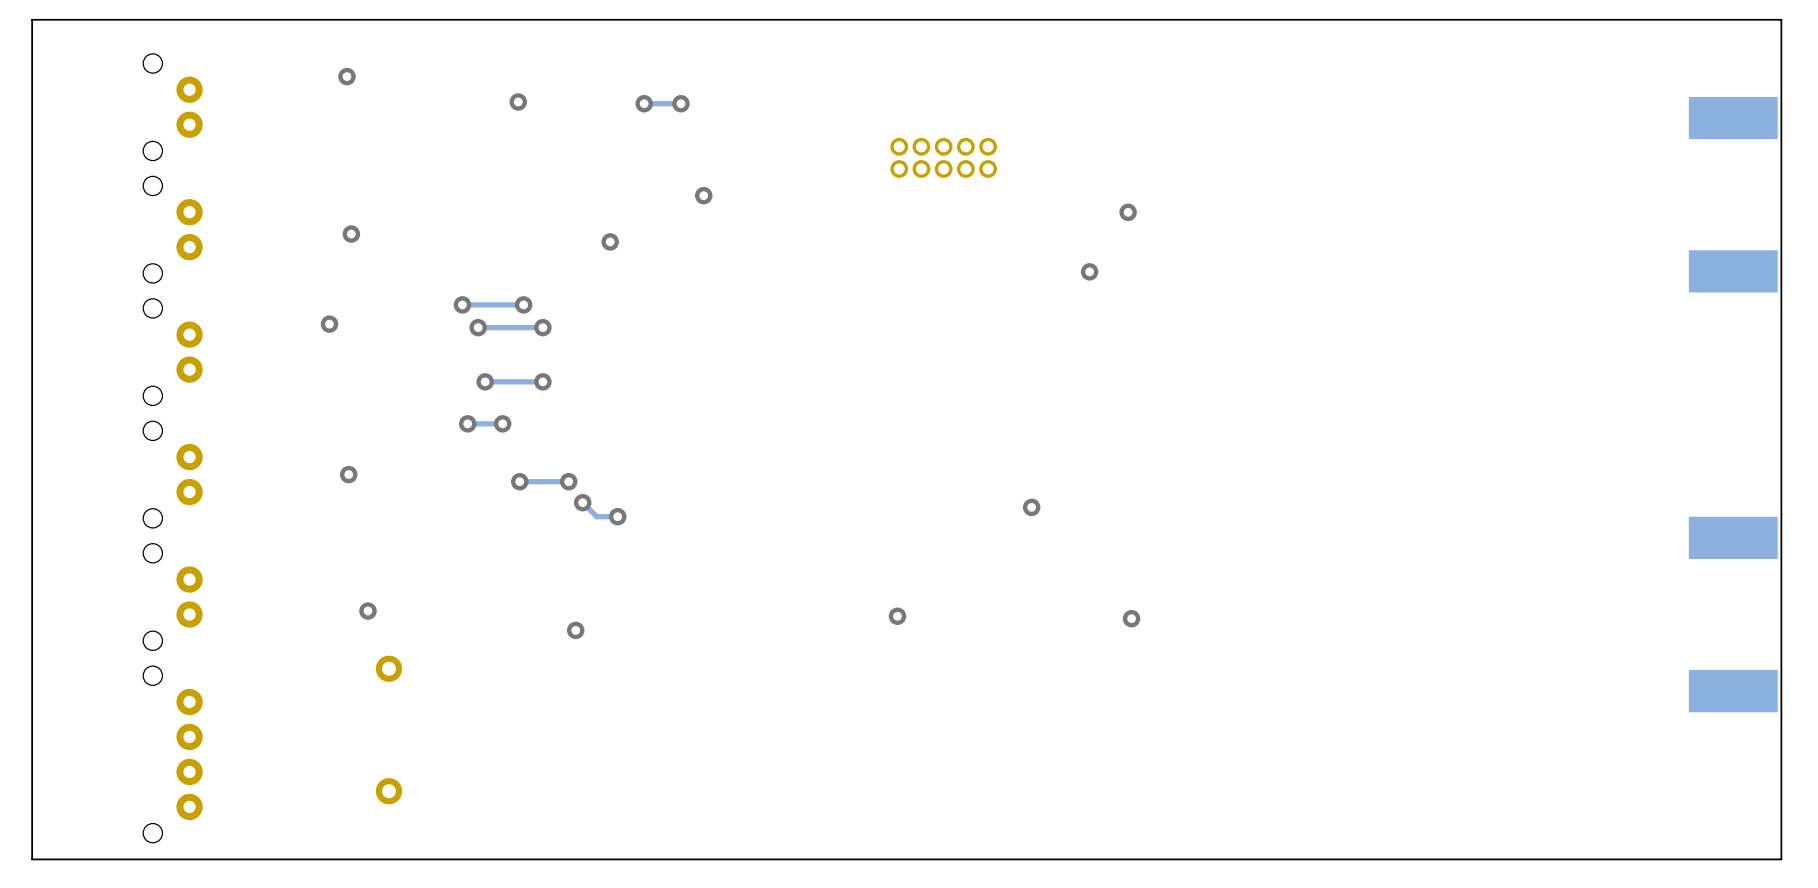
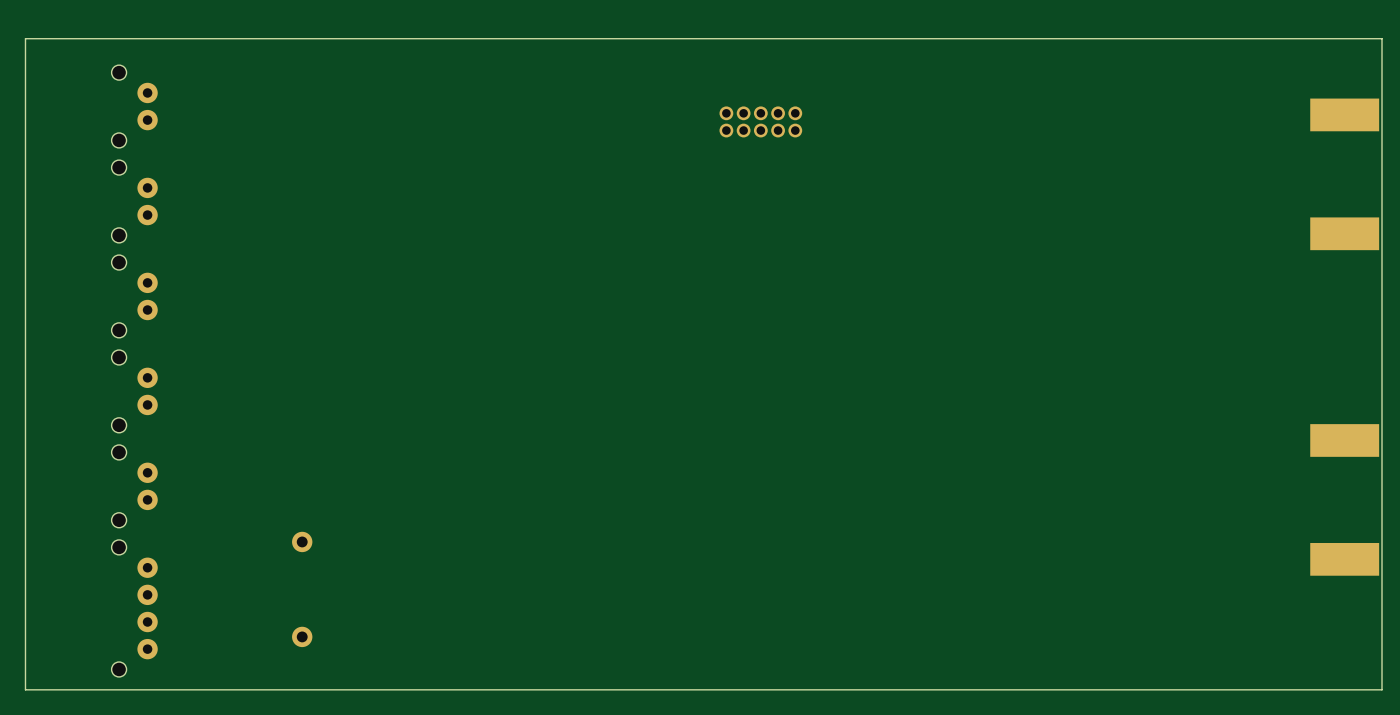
via: (346, 76) -> none
via: (518, 101) -> none
via: (644, 103) -> none
track: (680, 103) (644, 103) -> none
via: (680, 103) -> none
part position: (943, 157) -> (760, 121)
via: (703, 195) -> none
via: (1128, 212) -> none
via: (351, 234) -> none
via: (610, 241) -> none
via: (1089, 271) -> none
via: (462, 304) -> none
track: (523, 304) (462, 304) -> none
via: (523, 304) -> none
via: (329, 324) -> none
via: (478, 327) -> none
track: (542, 327) (478, 327) -> none
via: (542, 327) -> none
via: (485, 381) -> none
track: (542, 381) (485, 381) -> none
via: (542, 381) -> none
via: (467, 423) -> none
track: (502, 423) (467, 423) -> none
via: (502, 423) -> none
via: (348, 474) -> none
via: (519, 481) -> none
track: (568, 481) (519, 481) -> none
via: (568, 481) -> none
track: (582, 502) (596, 516) (617, 516) -> none
via: (582, 502) -> none
via: (1031, 507) -> none
via: (617, 516) -> none
via: (367, 611) -> none
via: (897, 616) -> none
via: (1131, 618) -> none
via: (575, 630) -> none

